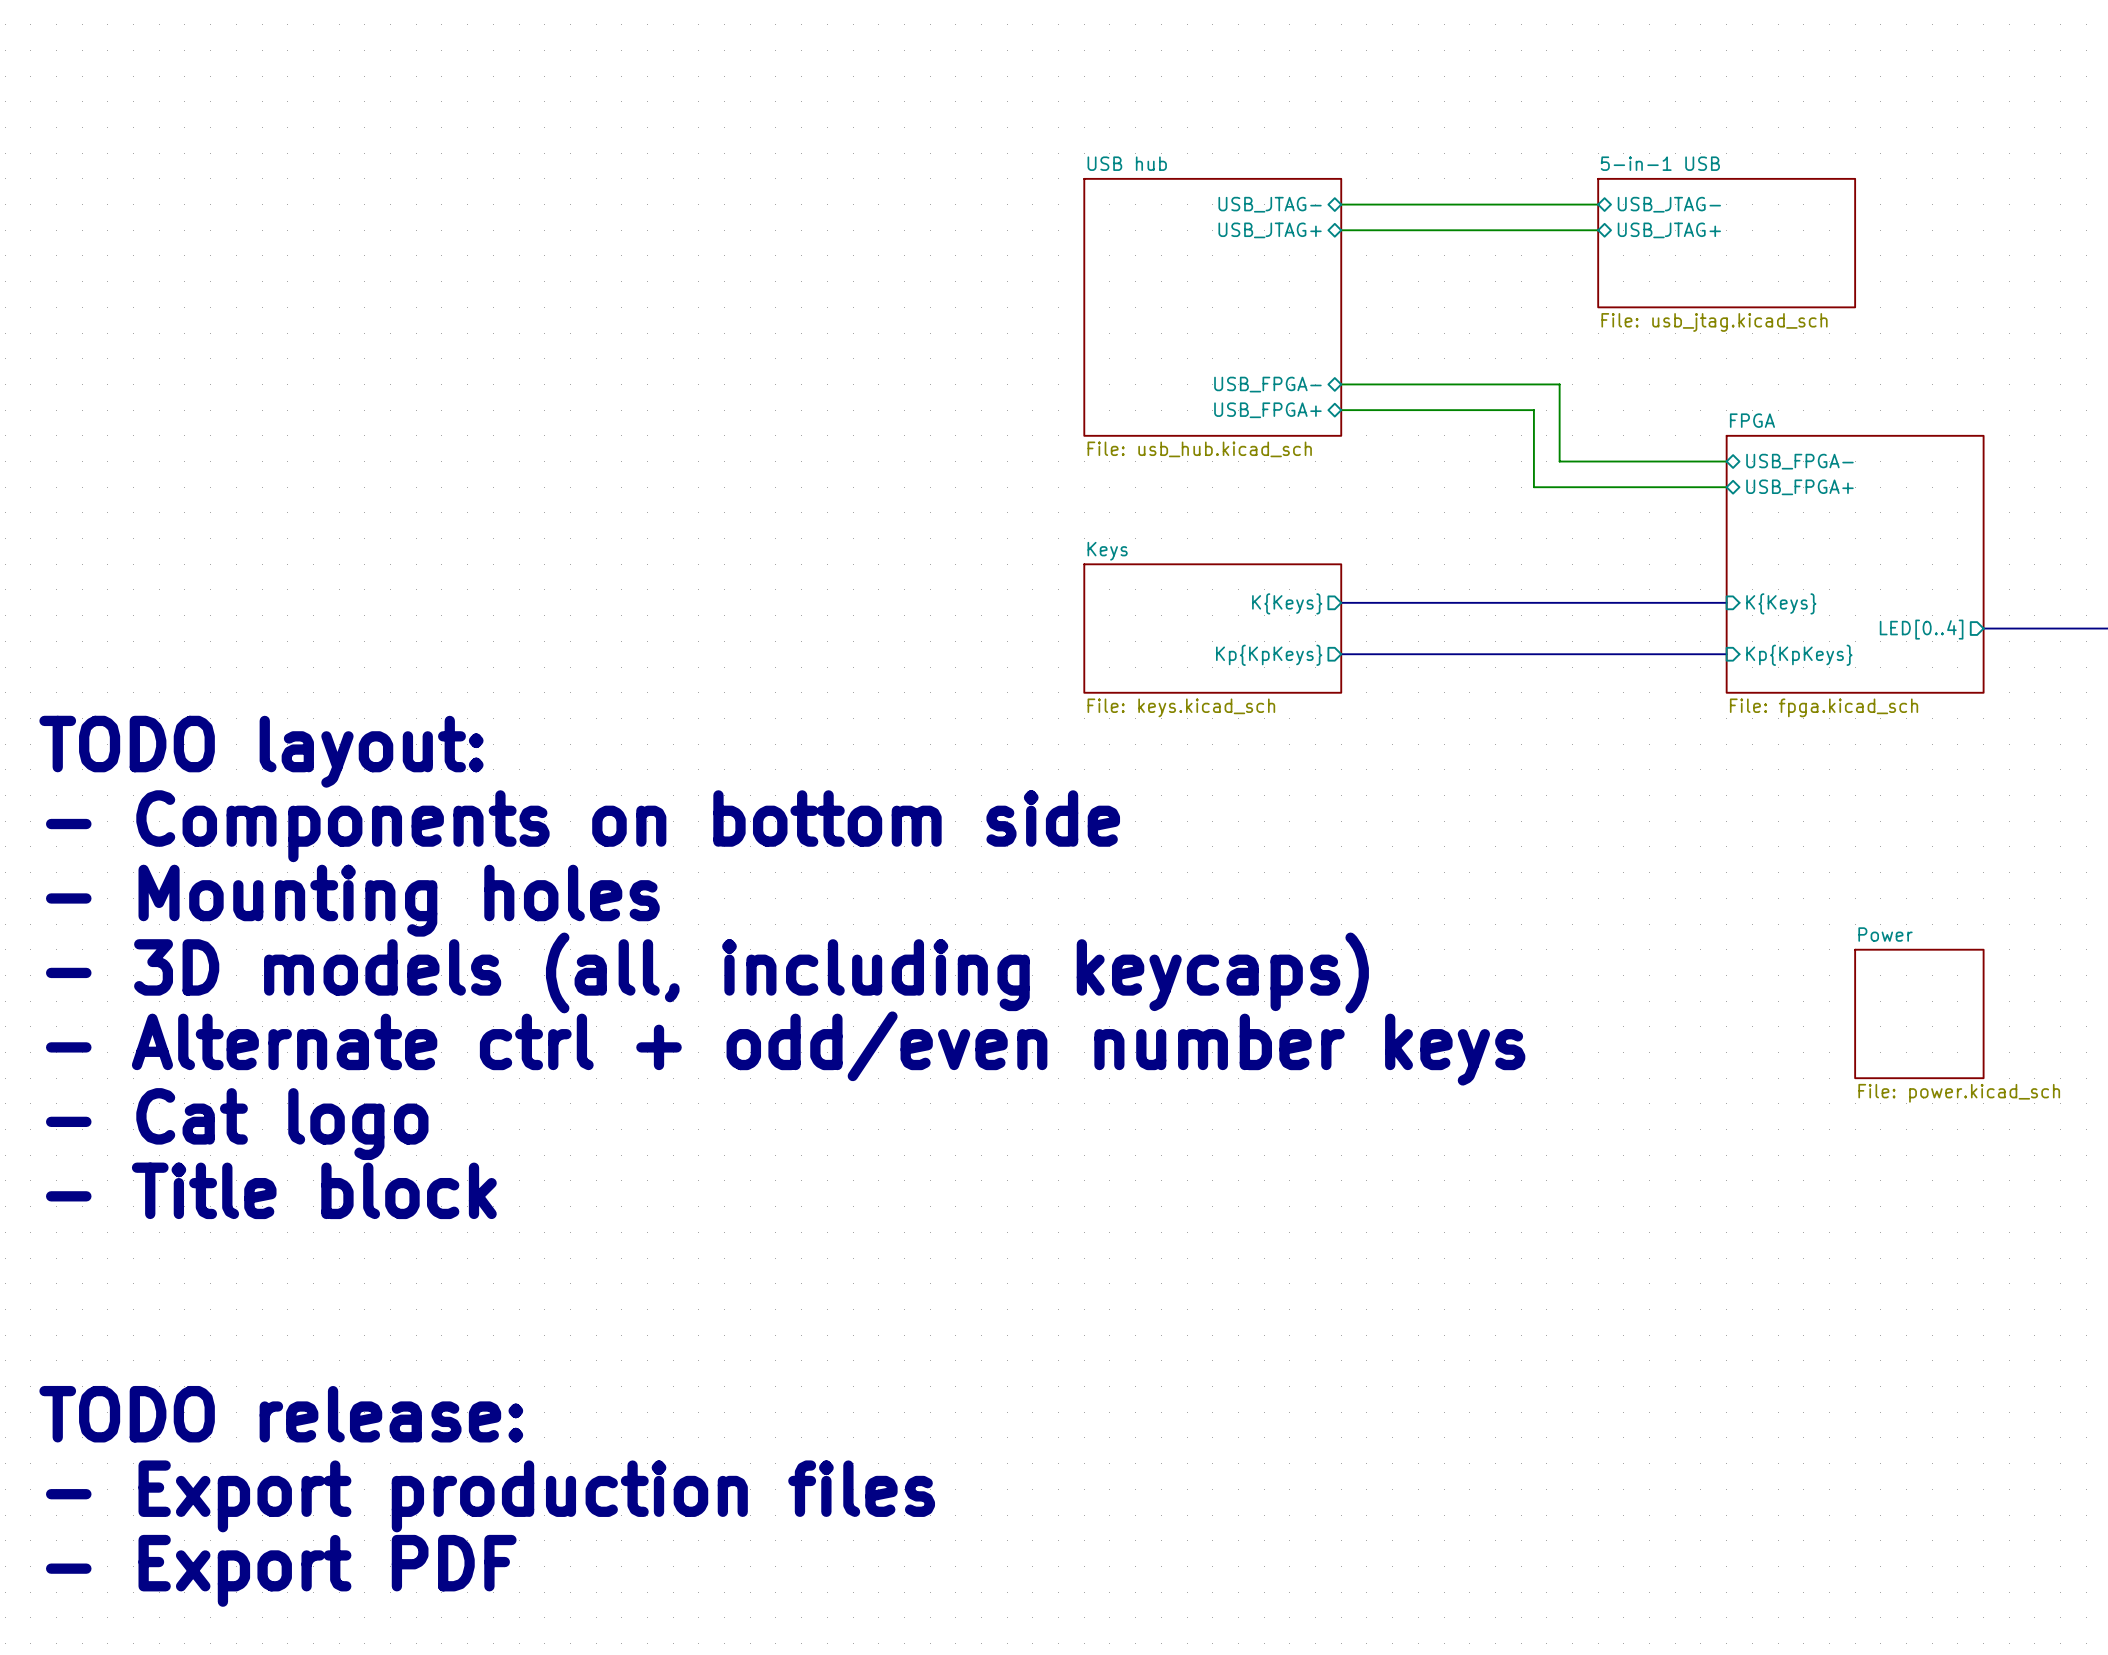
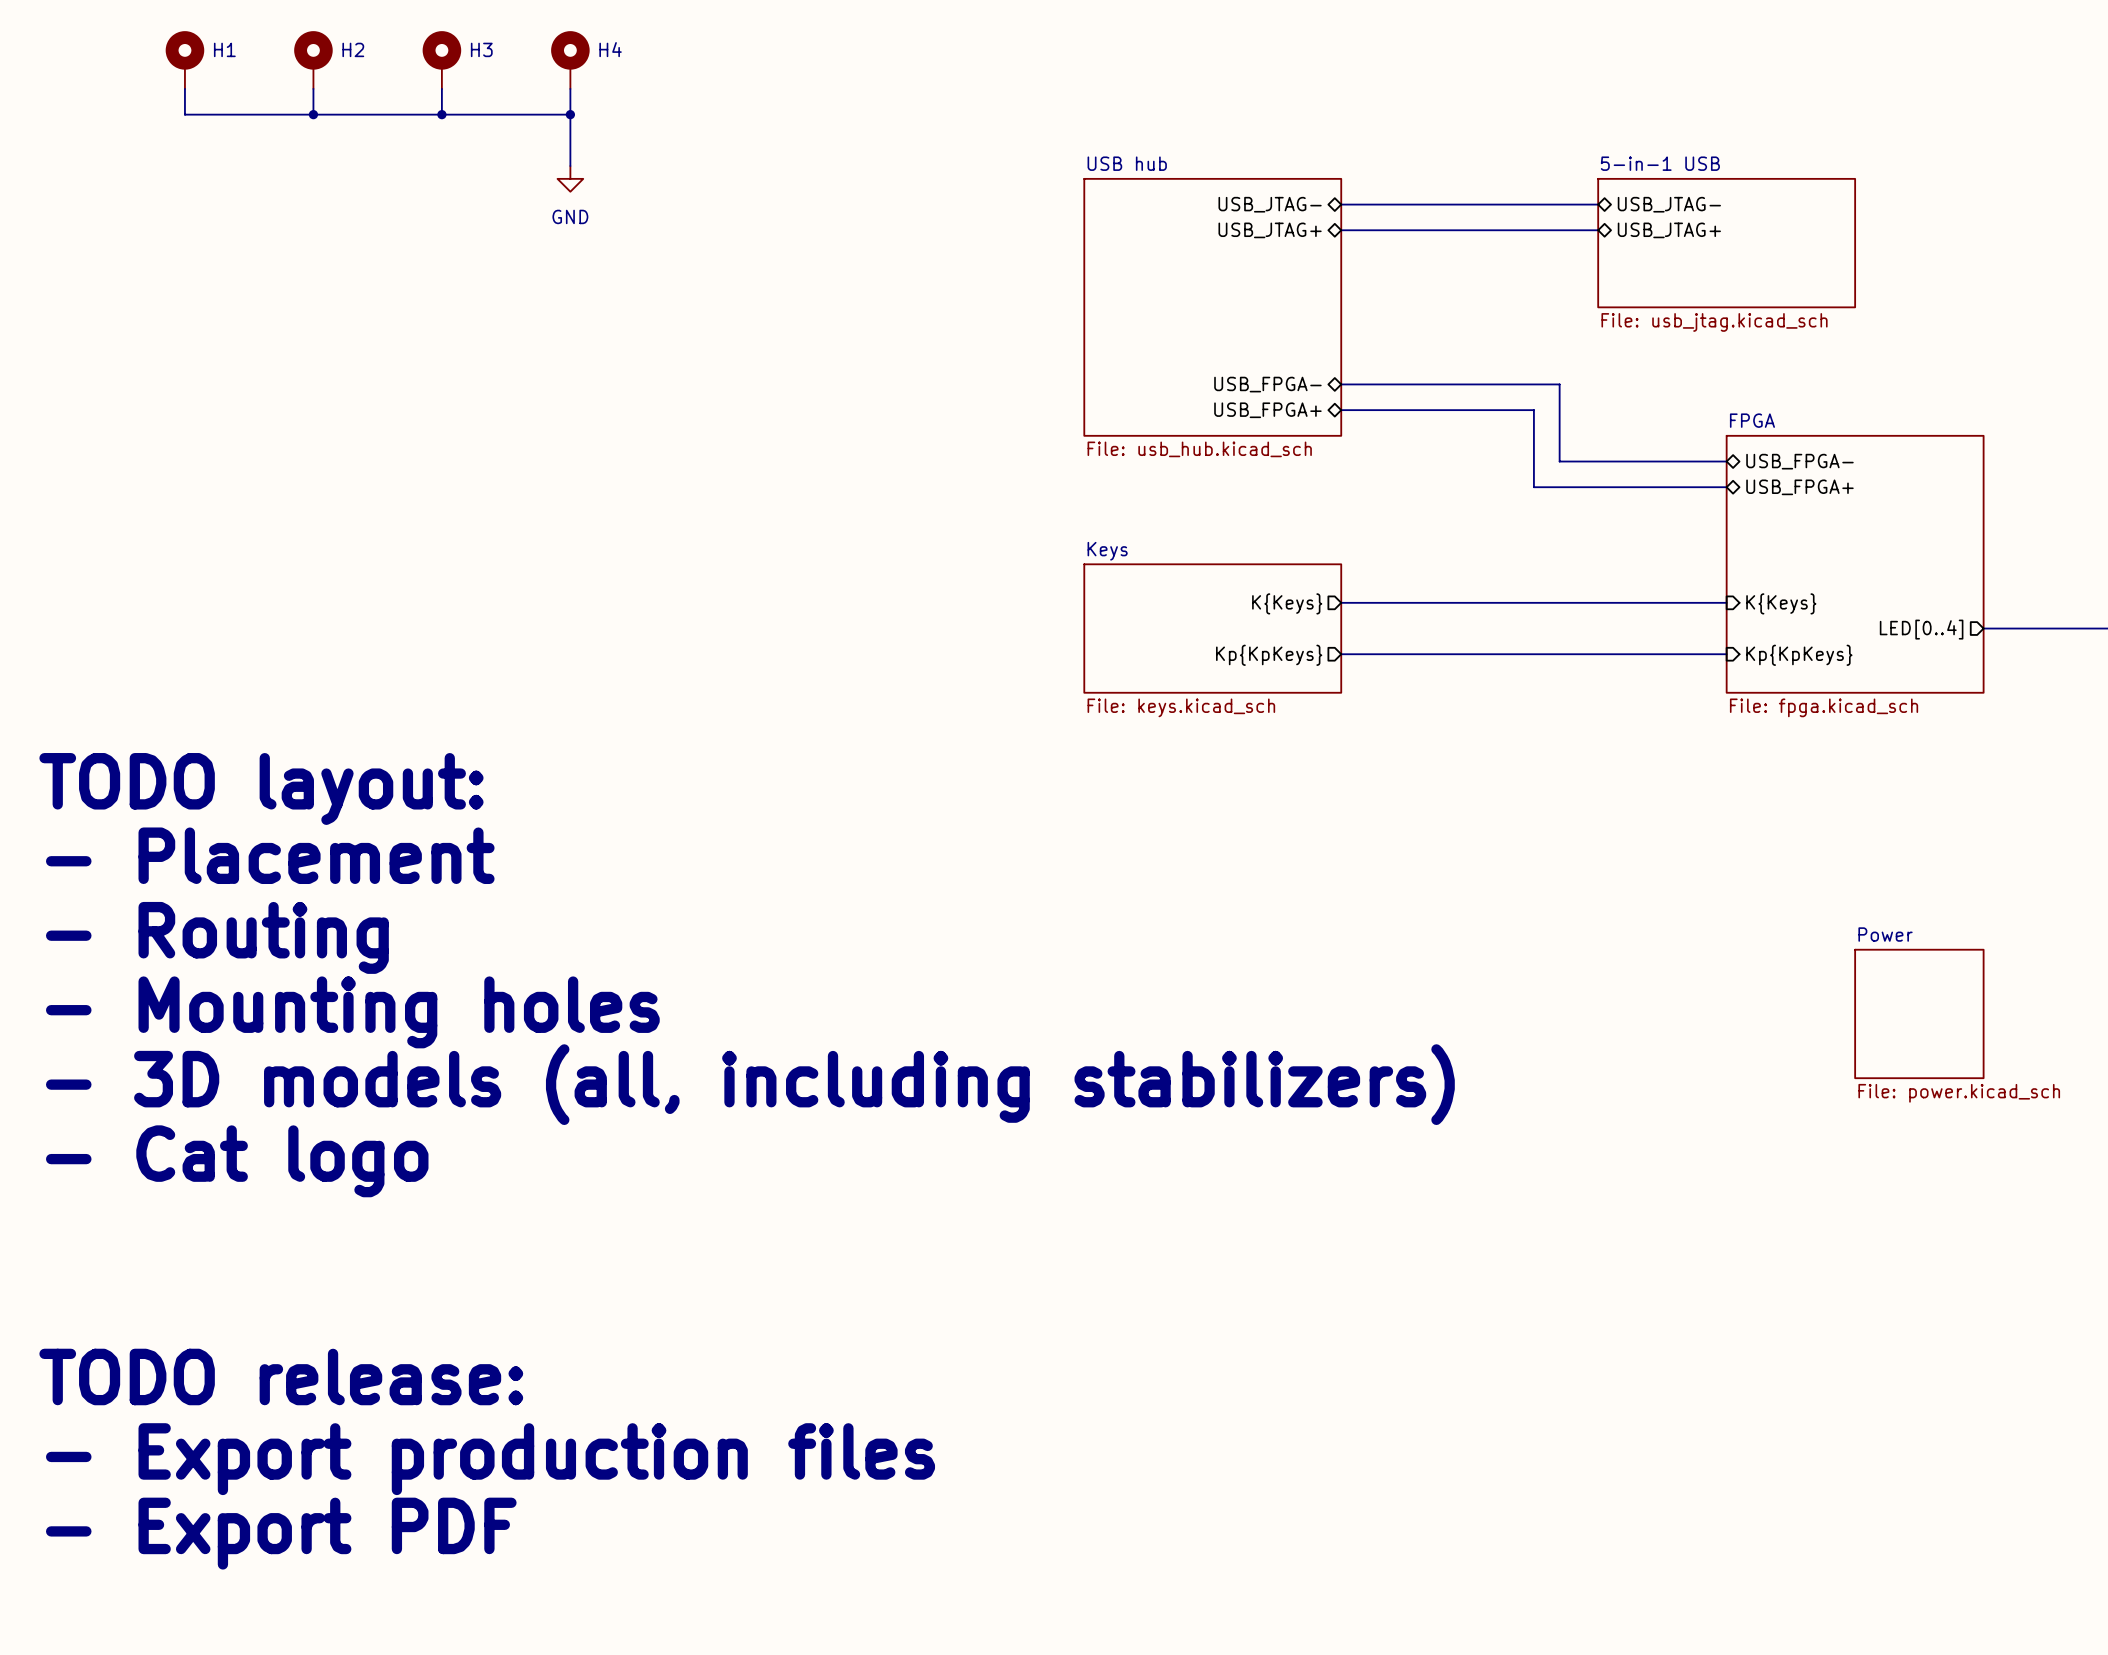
H1: none -> (184, 60)
H2: none -> (313, 60)
H3: none -> (441, 60)
H4: none -> (570, 60)
wire: none -> (184, 88) (184, 114) (570, 114)
wire: none -> (313, 88) (313, 114)
wire: none -> (441, 88) (441, 114)
wire: none -> (570, 88) (570, 166)
junction: none -> (313, 114)
junction: none -> (441, 114)
junction: none -> (570, 114)
power symbol: none -> GND (570, 178)
text position: TODO layout: (261, 751) -> TODO layout: (261, 788)
text: - Components on bottom side (583, 826) -> none
text: none -> - Placement (270, 855)
text position: - Mounting holes (352, 900) -> - Mounting holes (352, 1012)
text: none -> - Routing (217, 937)
text: - 3D models (all, including keycaps) (707, 972) -> none
text: - Alternate ctrl + odd/even number keys (785, 1048) -> none
text: none -> - 3D models (all, including stabilizers) (750, 1084)
text position: - Cat logo (237, 1124) -> - Cat logo (237, 1161)
text: - Title block (271, 1190) -> none
text position: TODO release: (281, 1414) -> TODO release: (281, 1376)
text position: - Export production files (490, 1496) -> - Export production files (490, 1459)
text position: - Export PDF (281, 1570) -> - Export PDF (281, 1533)

